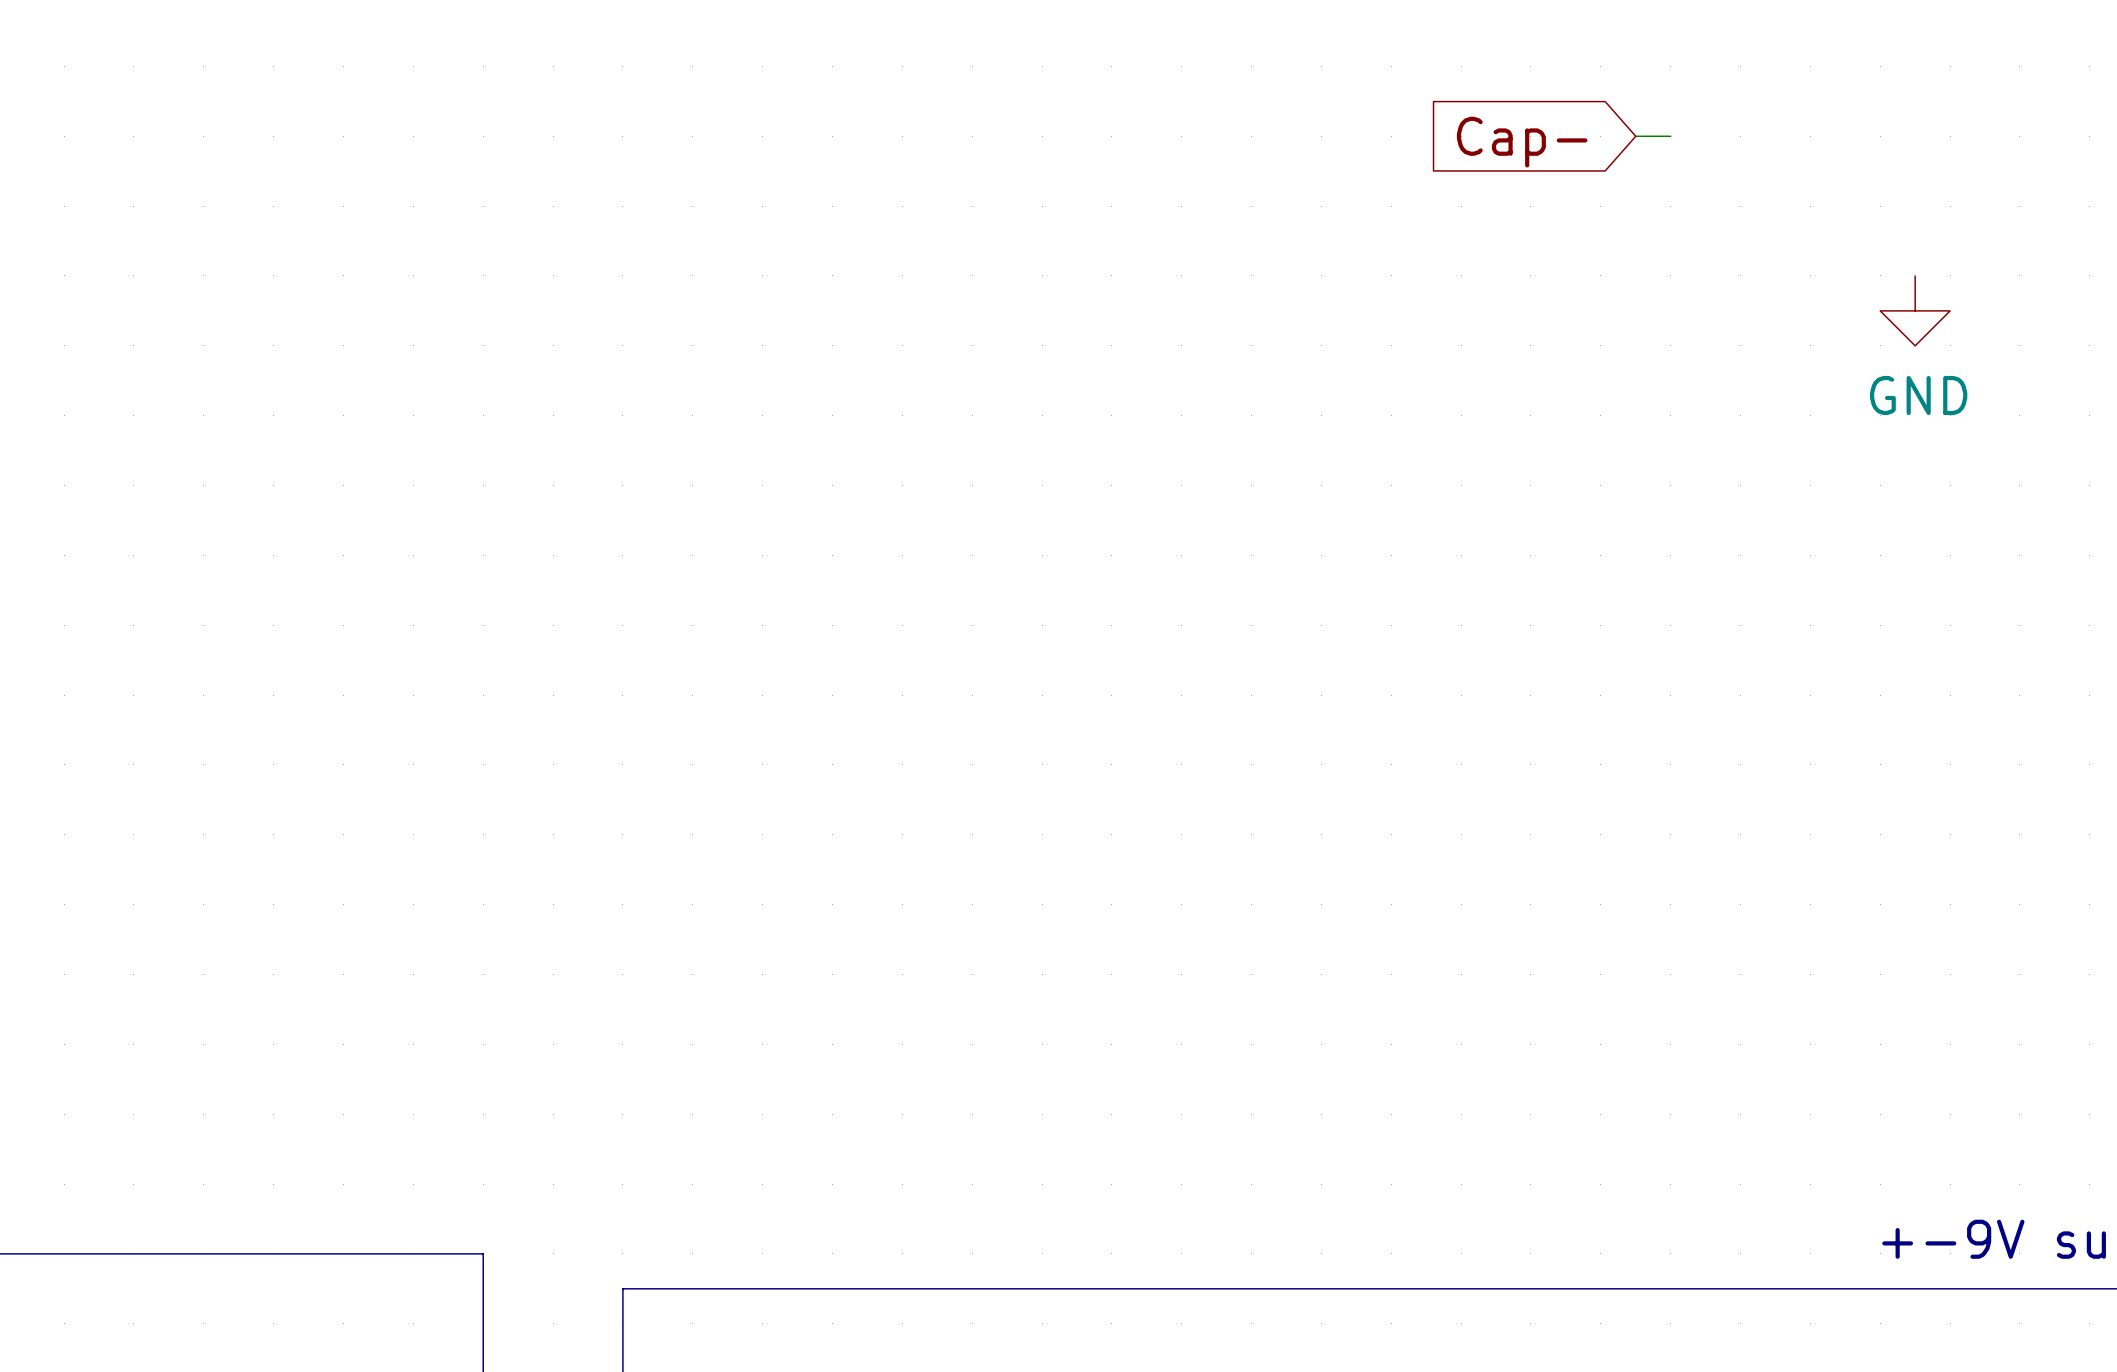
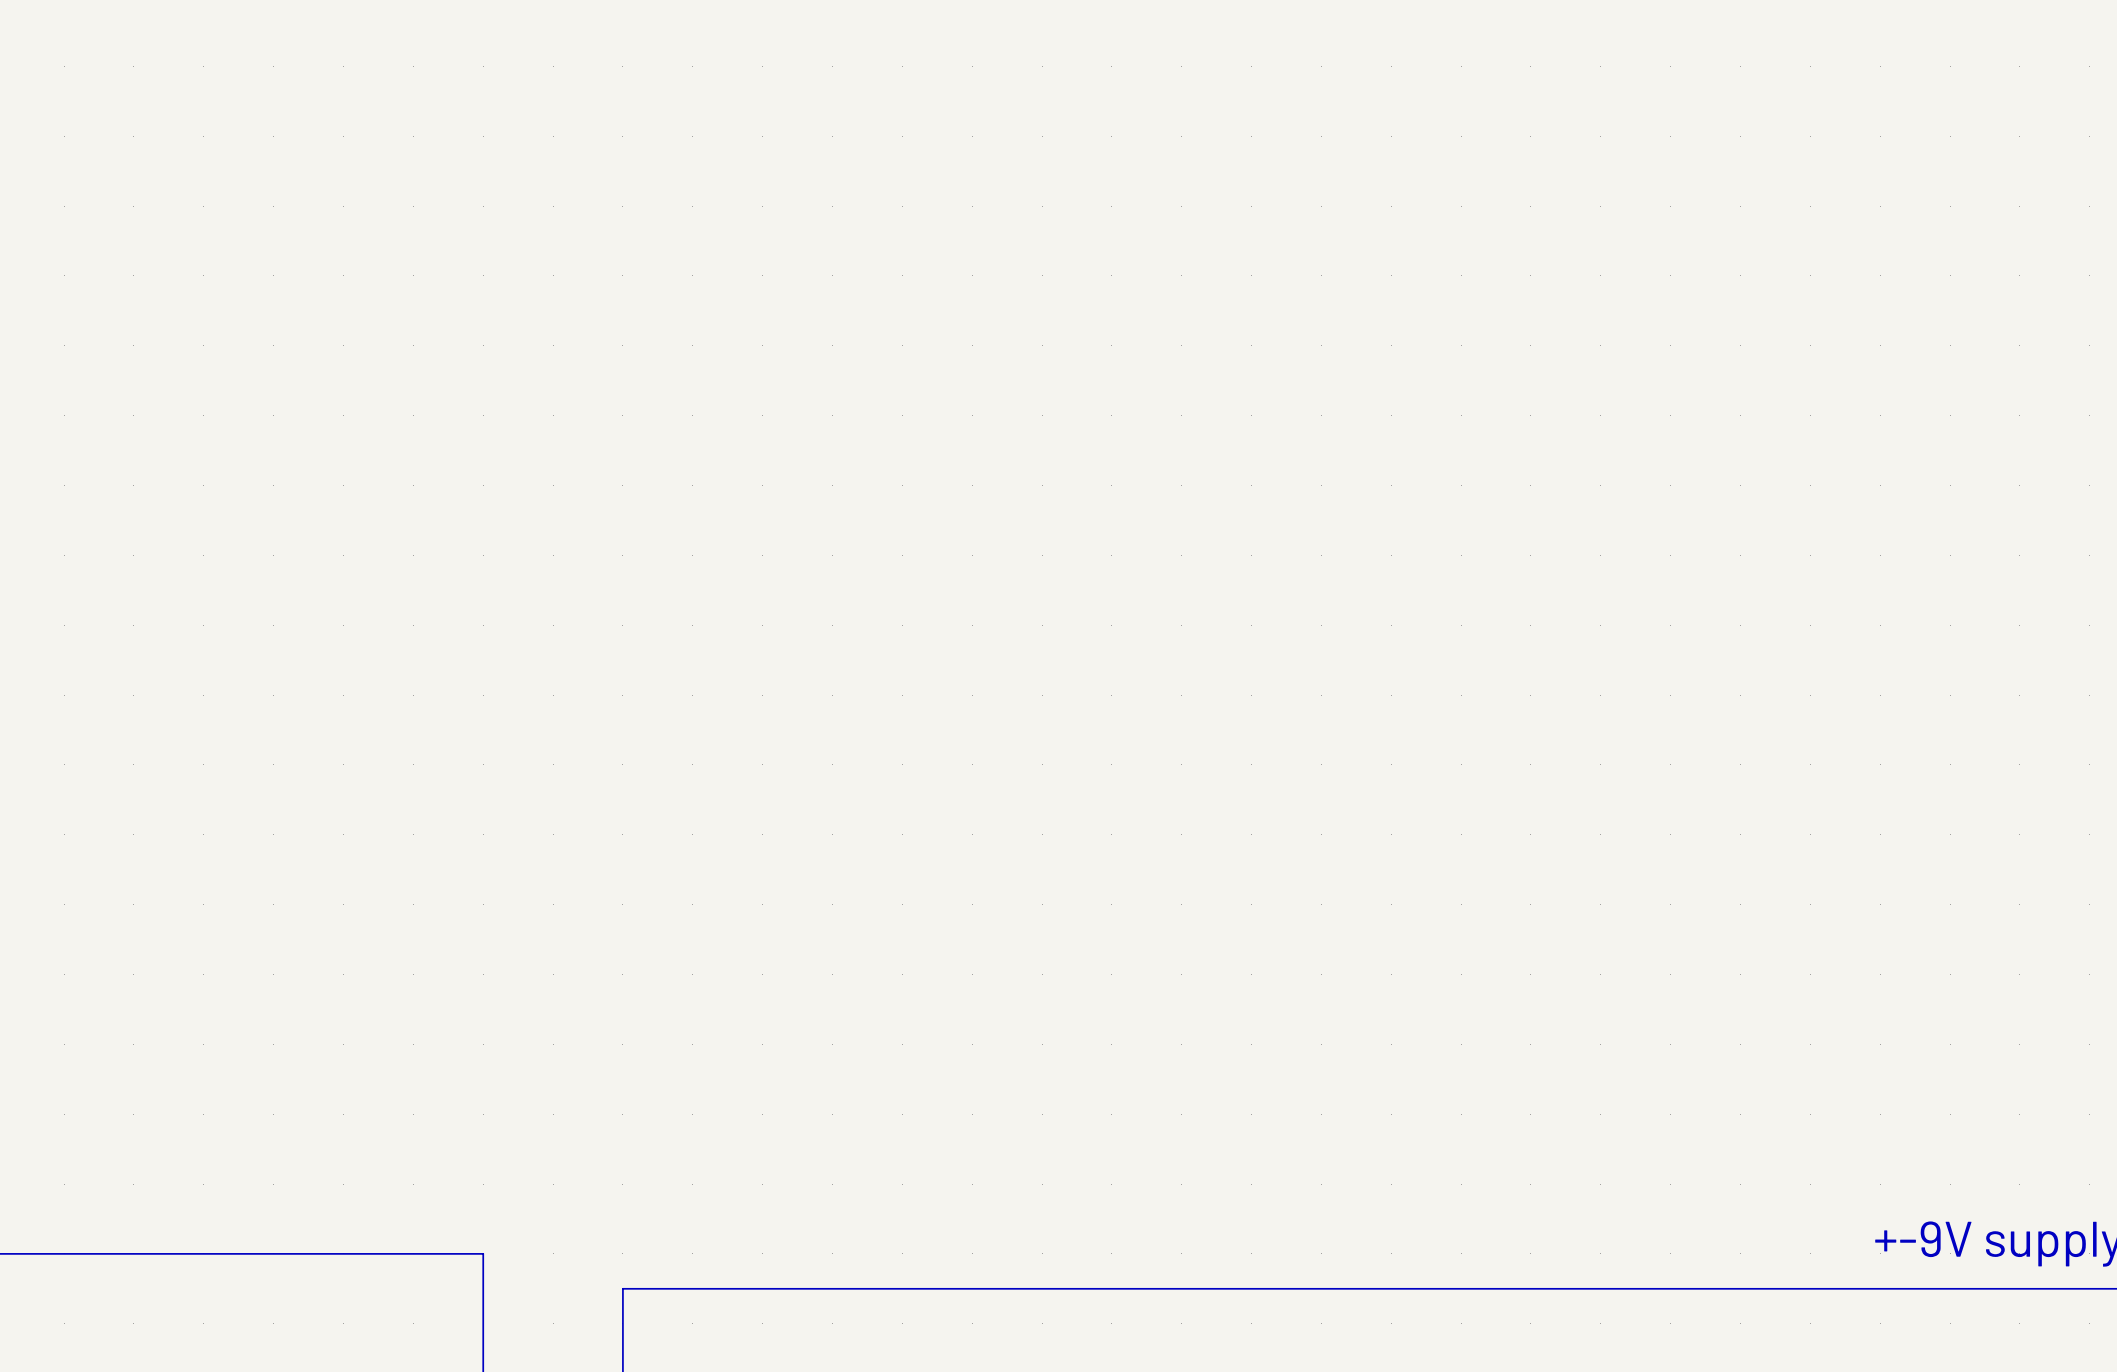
wire: (1635, 136) (1670, 136) -> none
global label: Cap- (1522, 142) -> none
power symbol: GND (1915, 310) -> none

